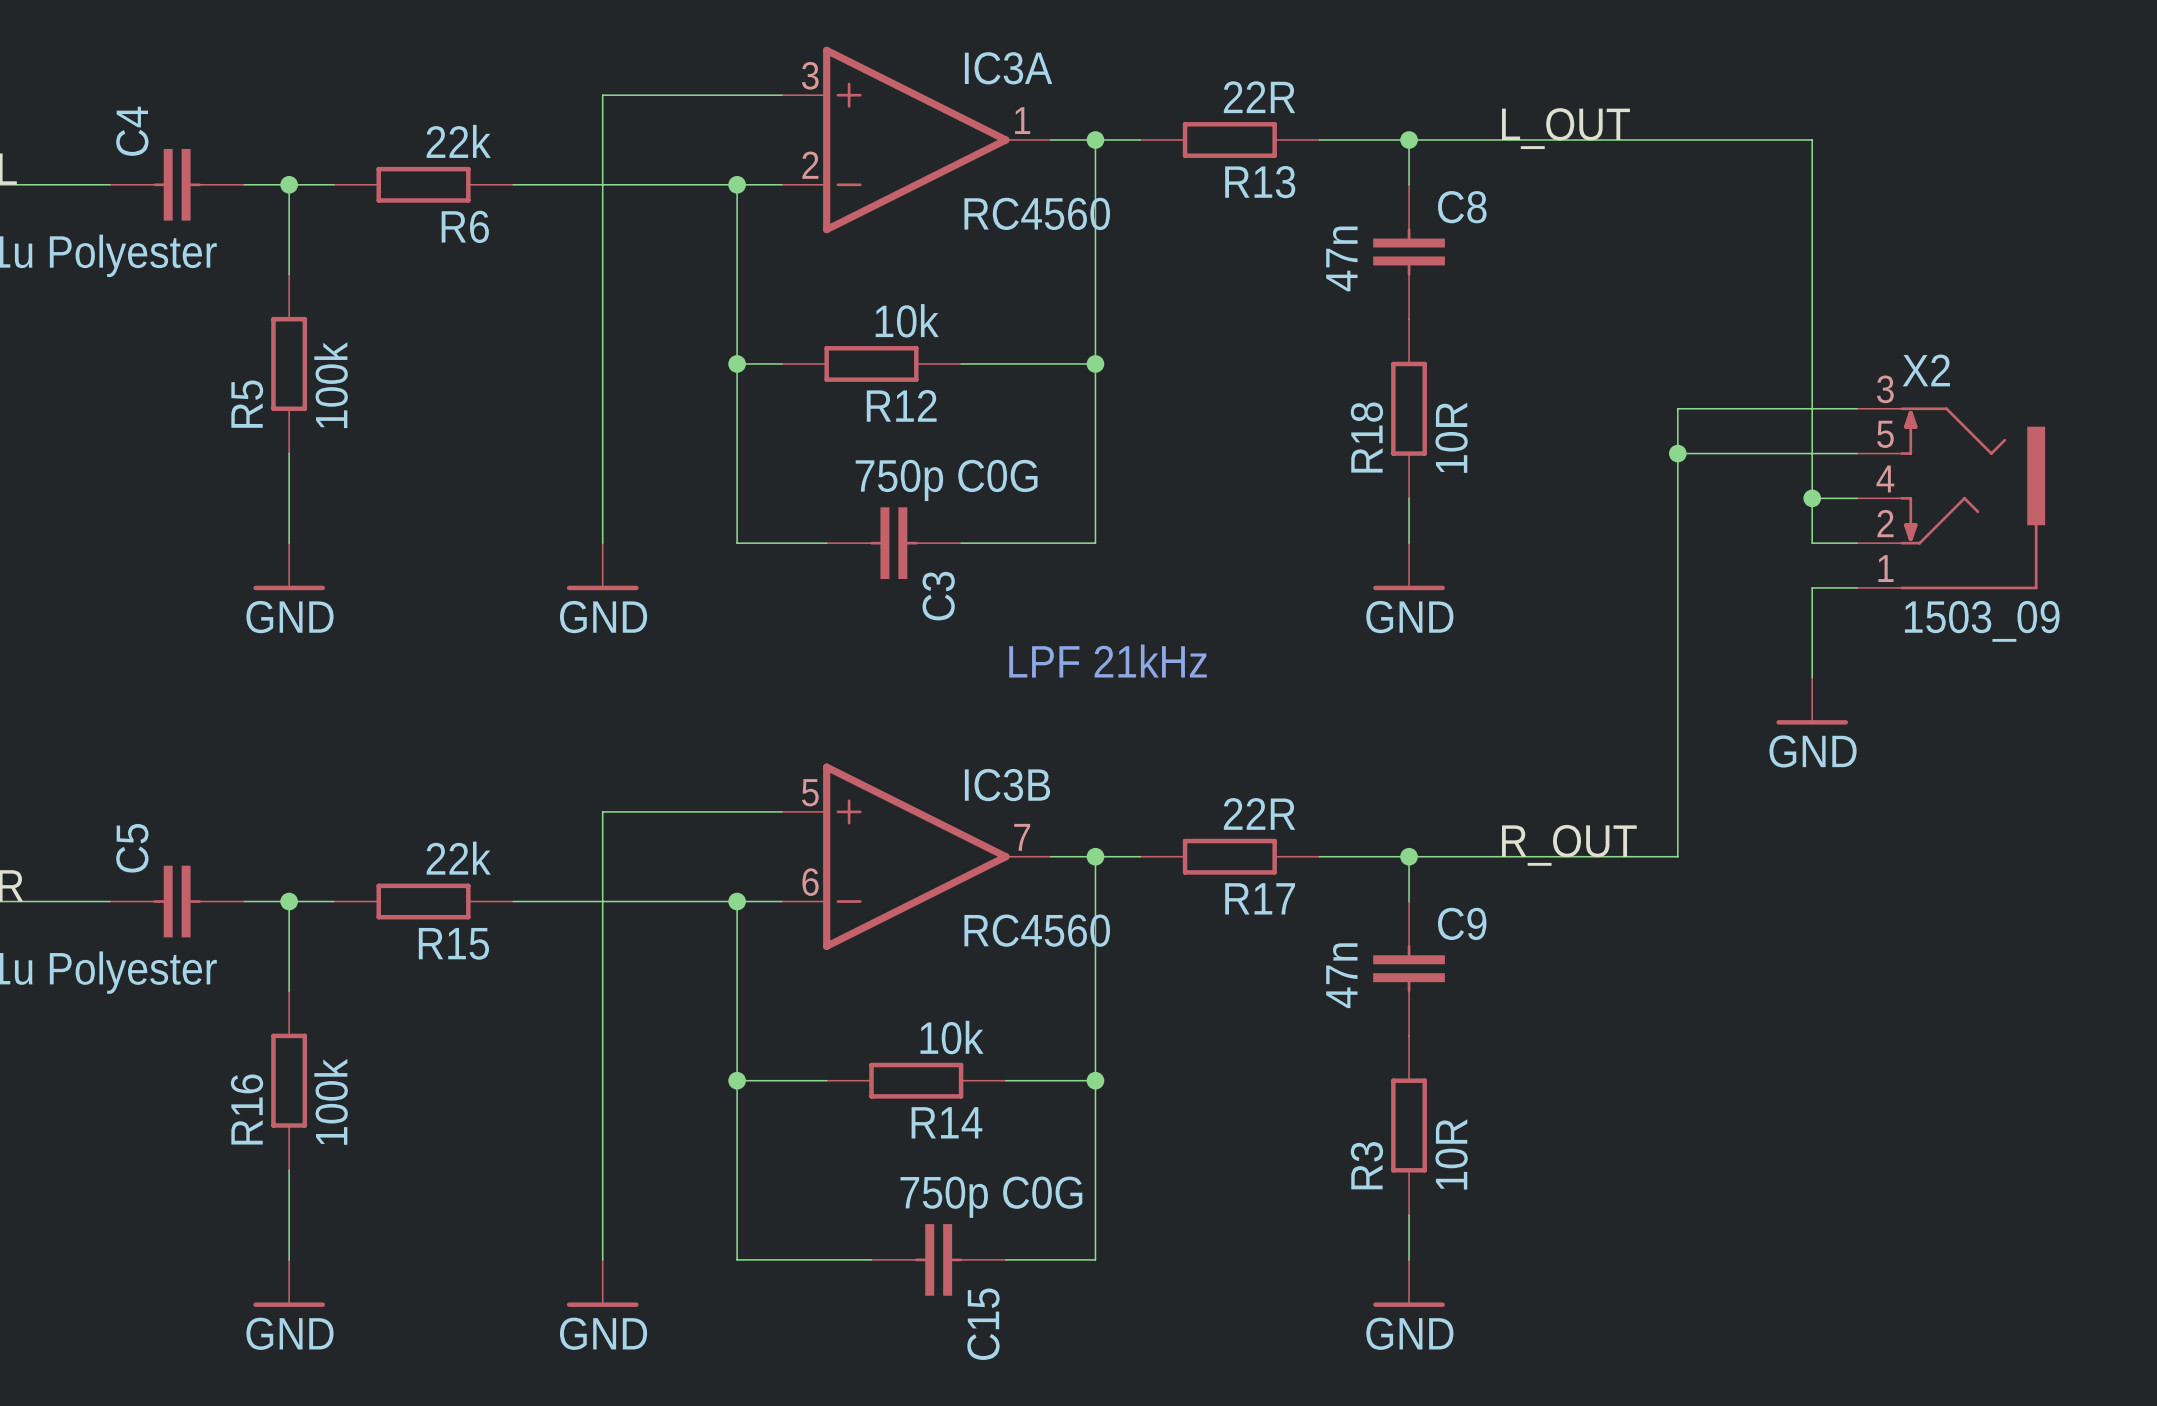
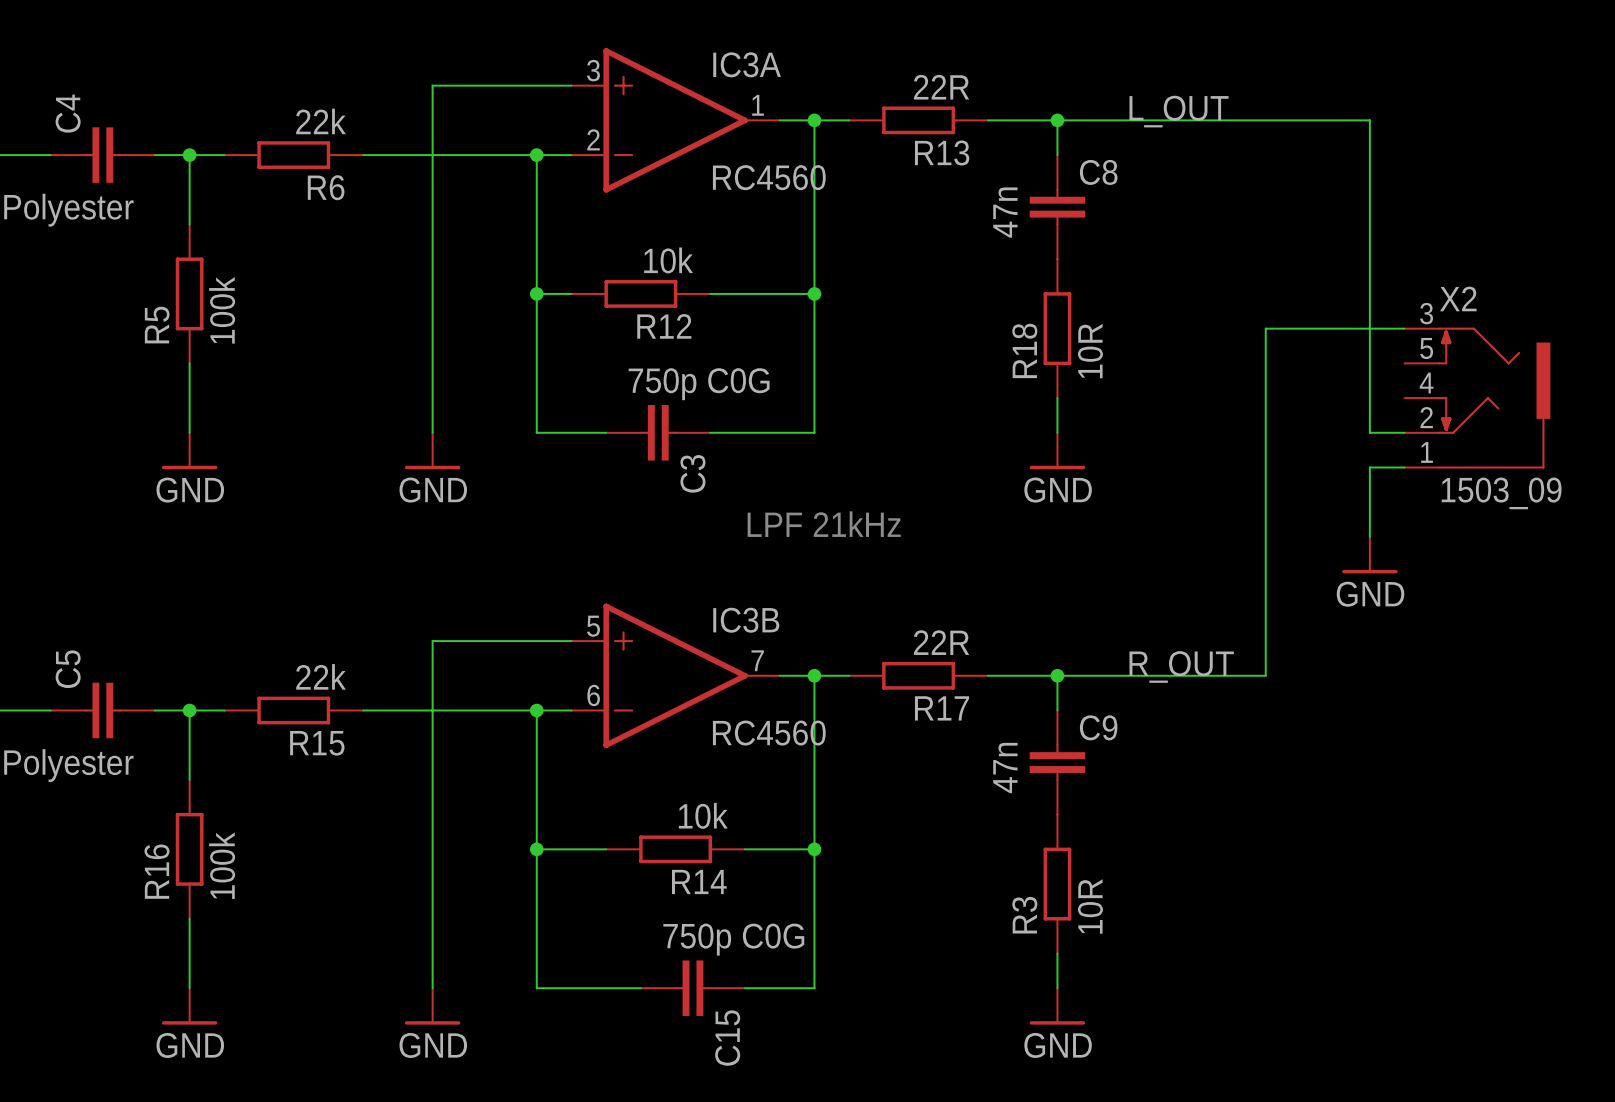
wire: (1677, 453) (1857, 453) -> none
junction: (1677, 453) -> none
wire: (1812, 498) (1857, 498) -> none
junction: (1812, 498) -> none

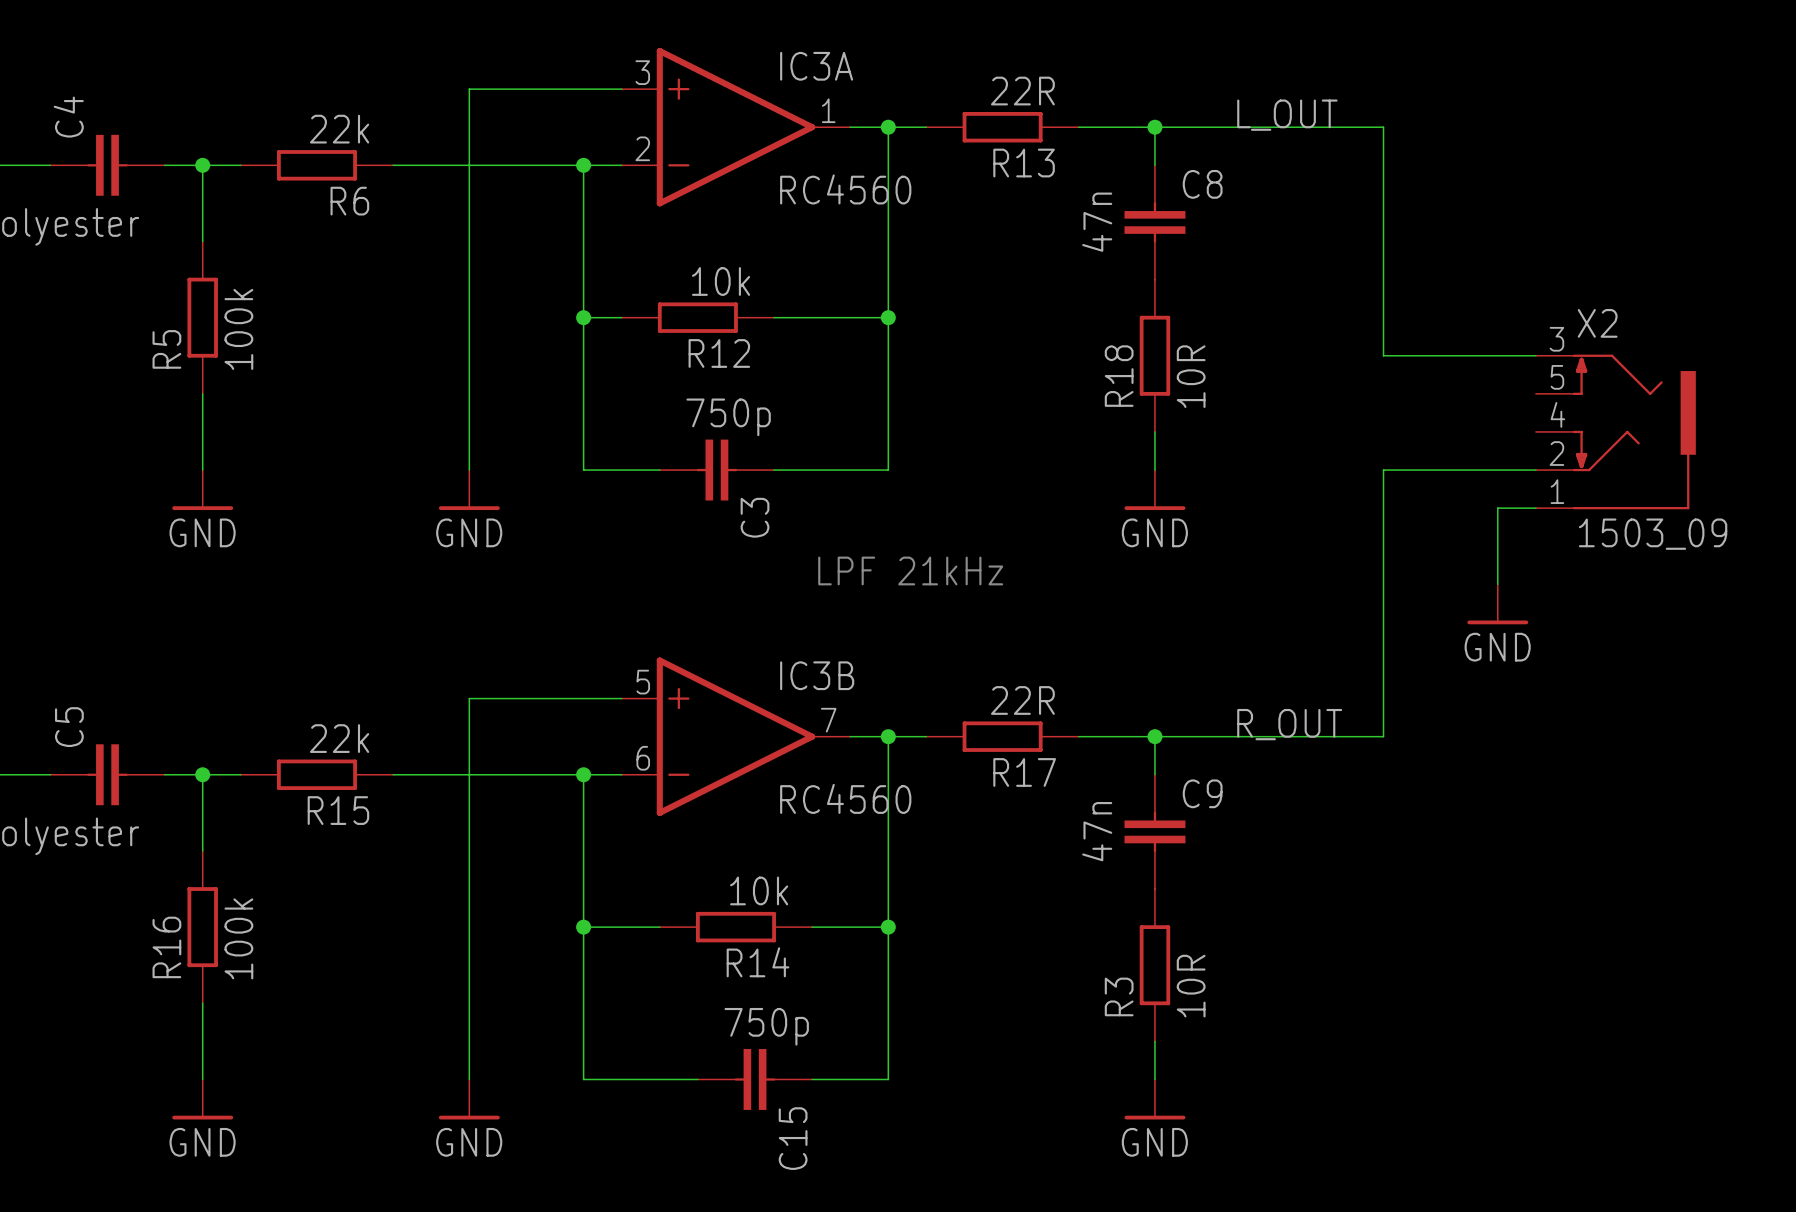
wire: (1265, 120) (1369, 120) (1369, 432) -> (1383, 127) (1383, 355)
wire: (1265, 328) (1265, 432) -> (1497, 470) (1383, 470)
C3 value: 750p C0G (699, 384) -> 750p (728, 417)
C15 value: 750p C0G (733, 939) -> 750p (766, 1026)

